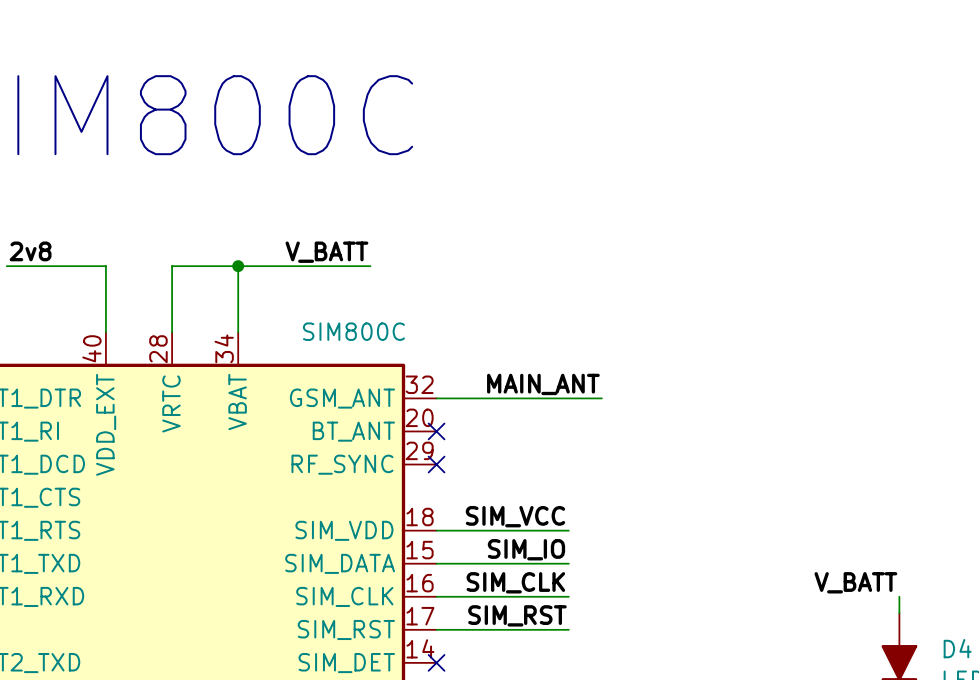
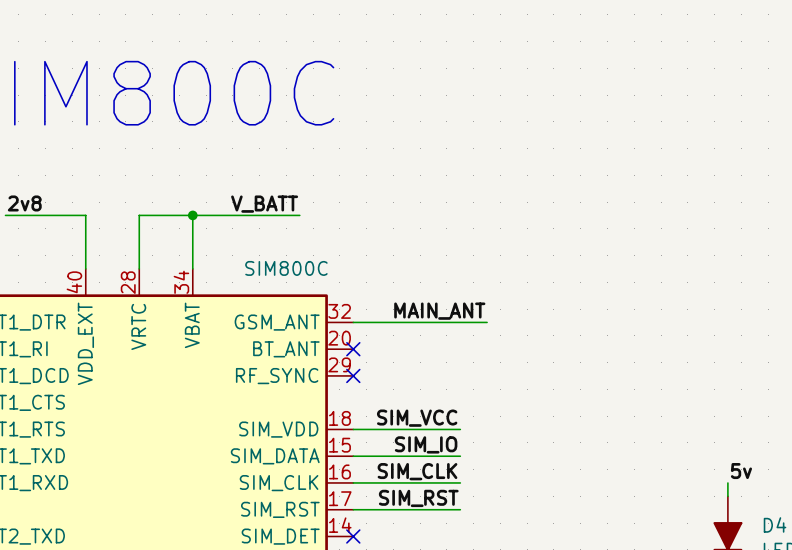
label: V_BATT (855, 582) -> 5v (741, 471)

